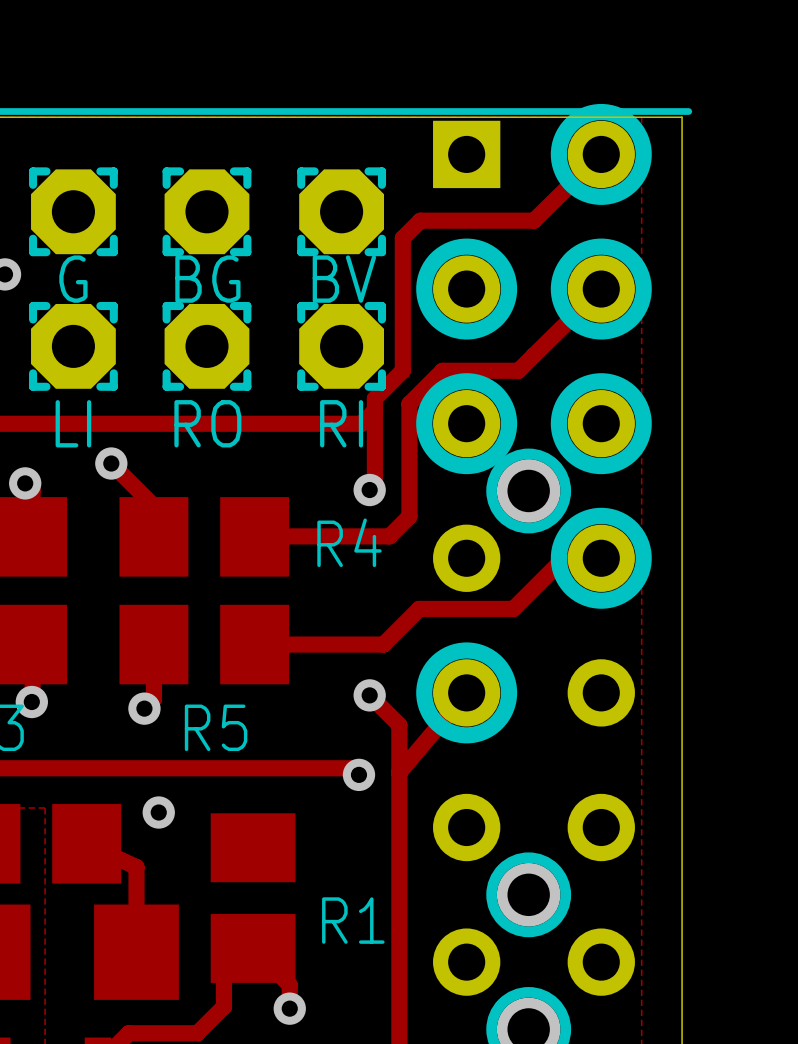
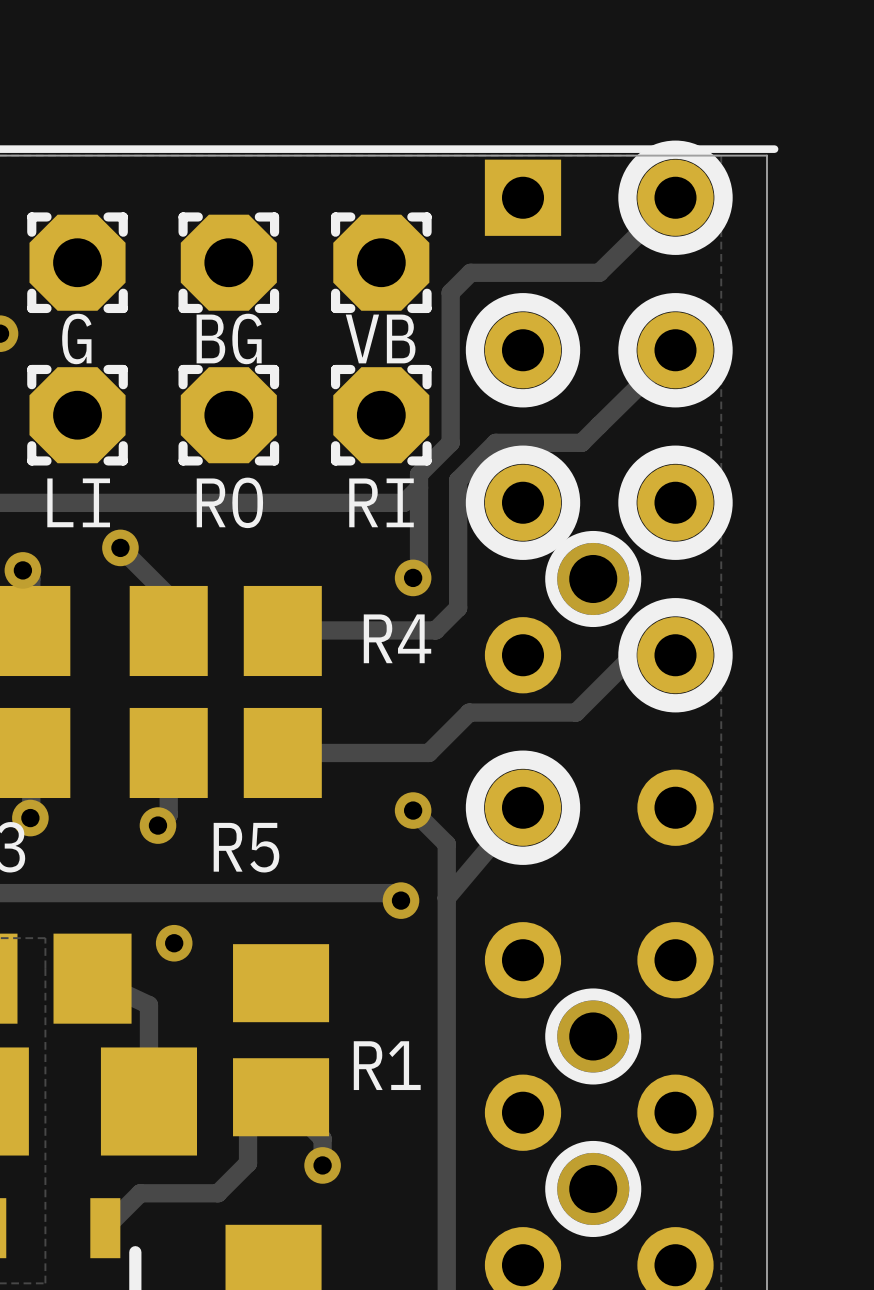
BV name: BV (344, 279) -> VB (380, 338)

